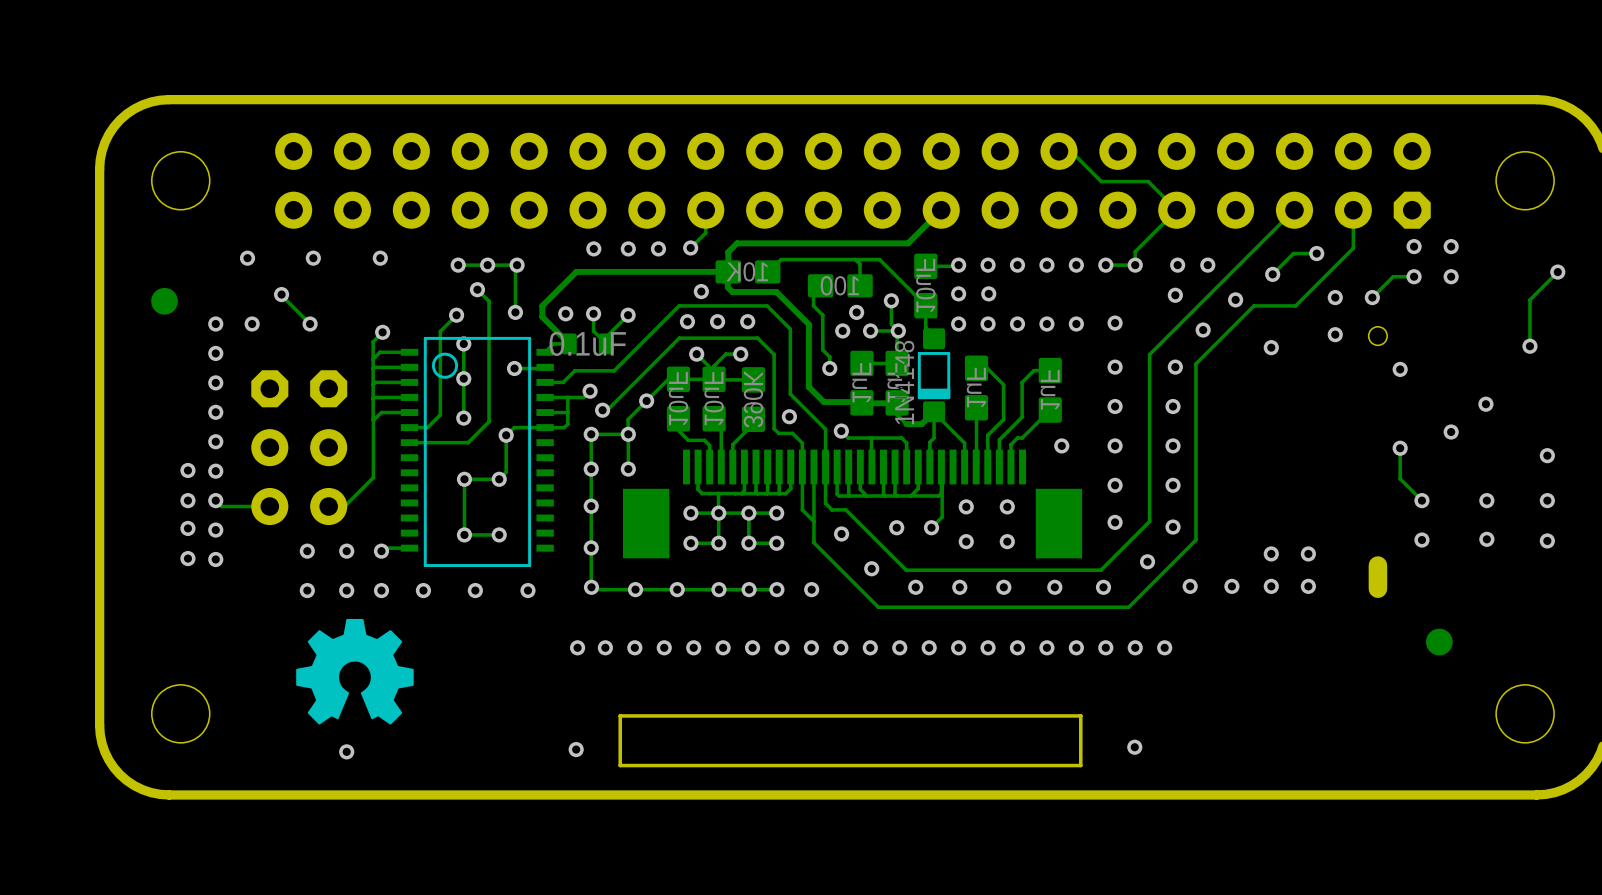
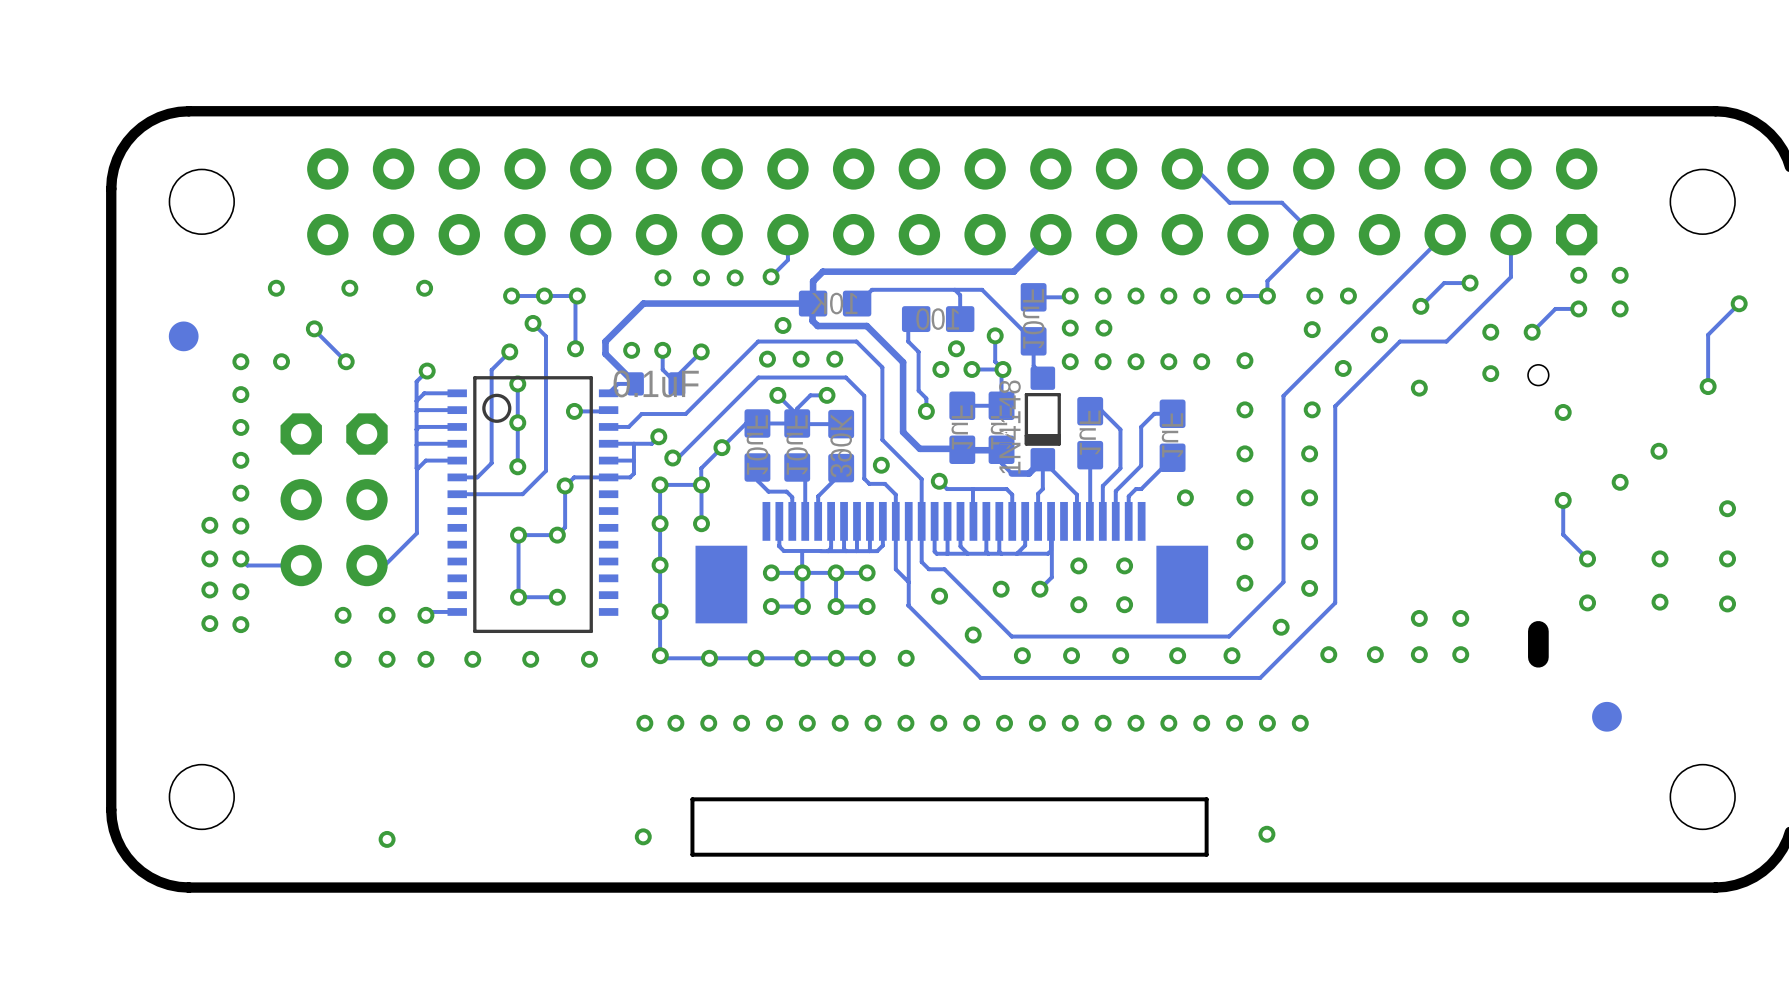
drawing: [296, 618, 414, 725] -> none

